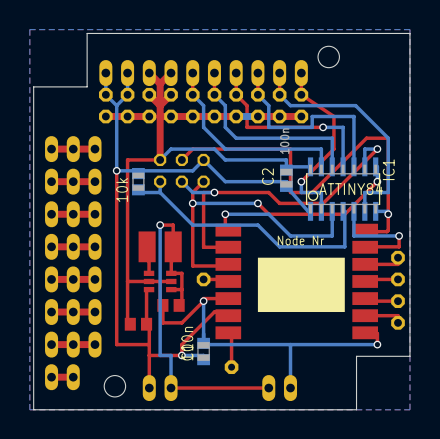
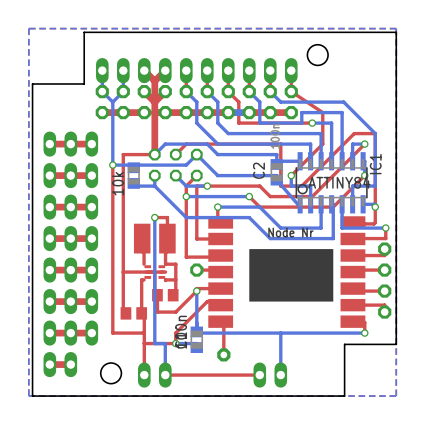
part footprint: [143, 270, 177, 293] -> [144, 265, 166, 279]

